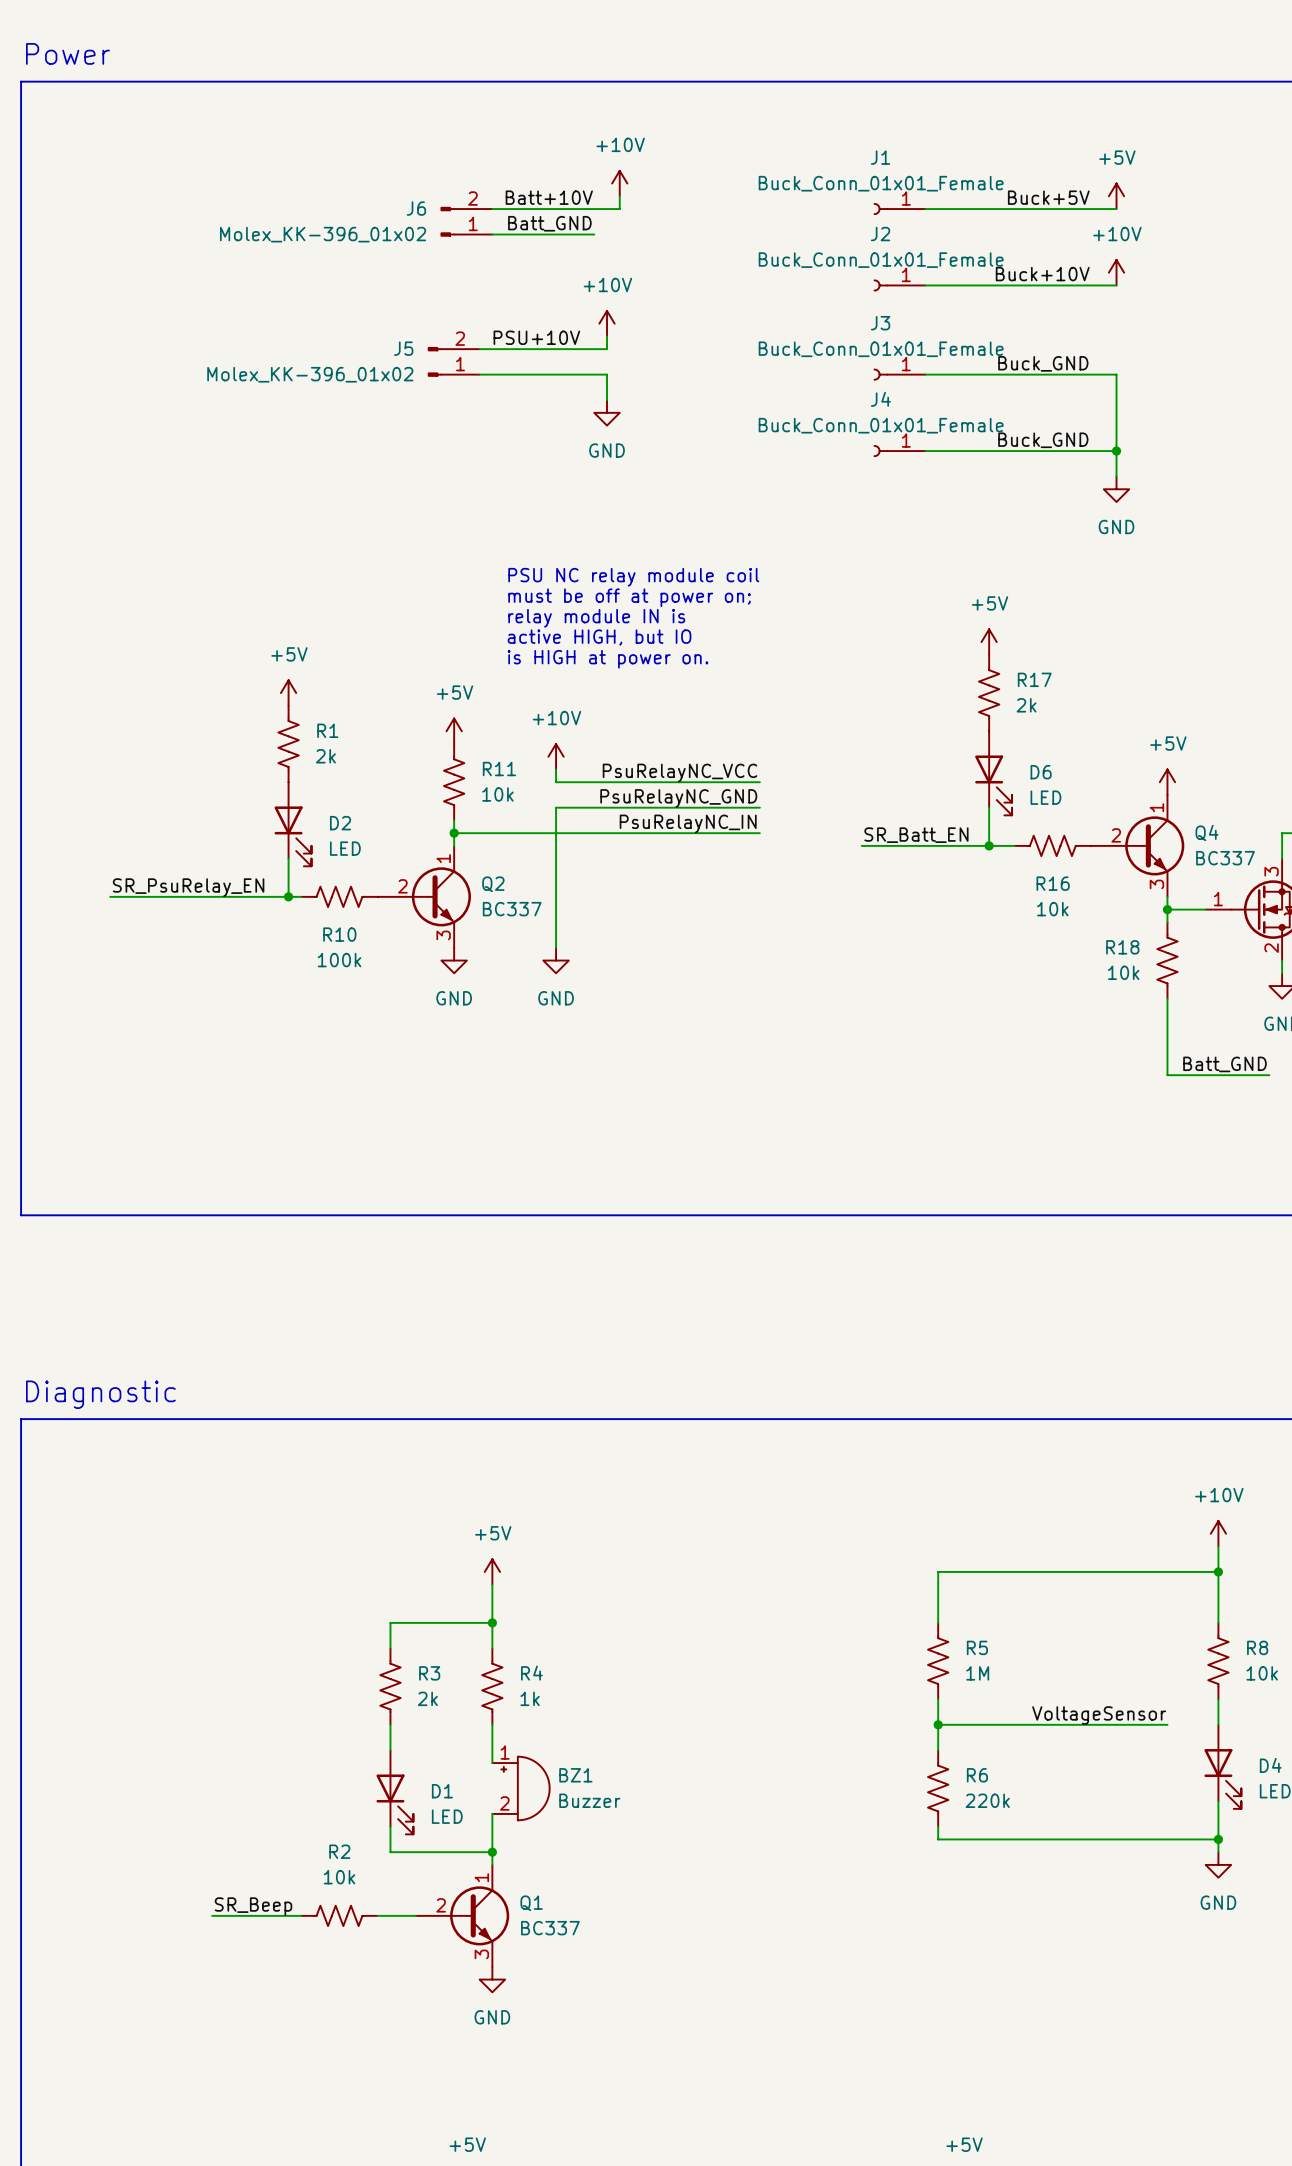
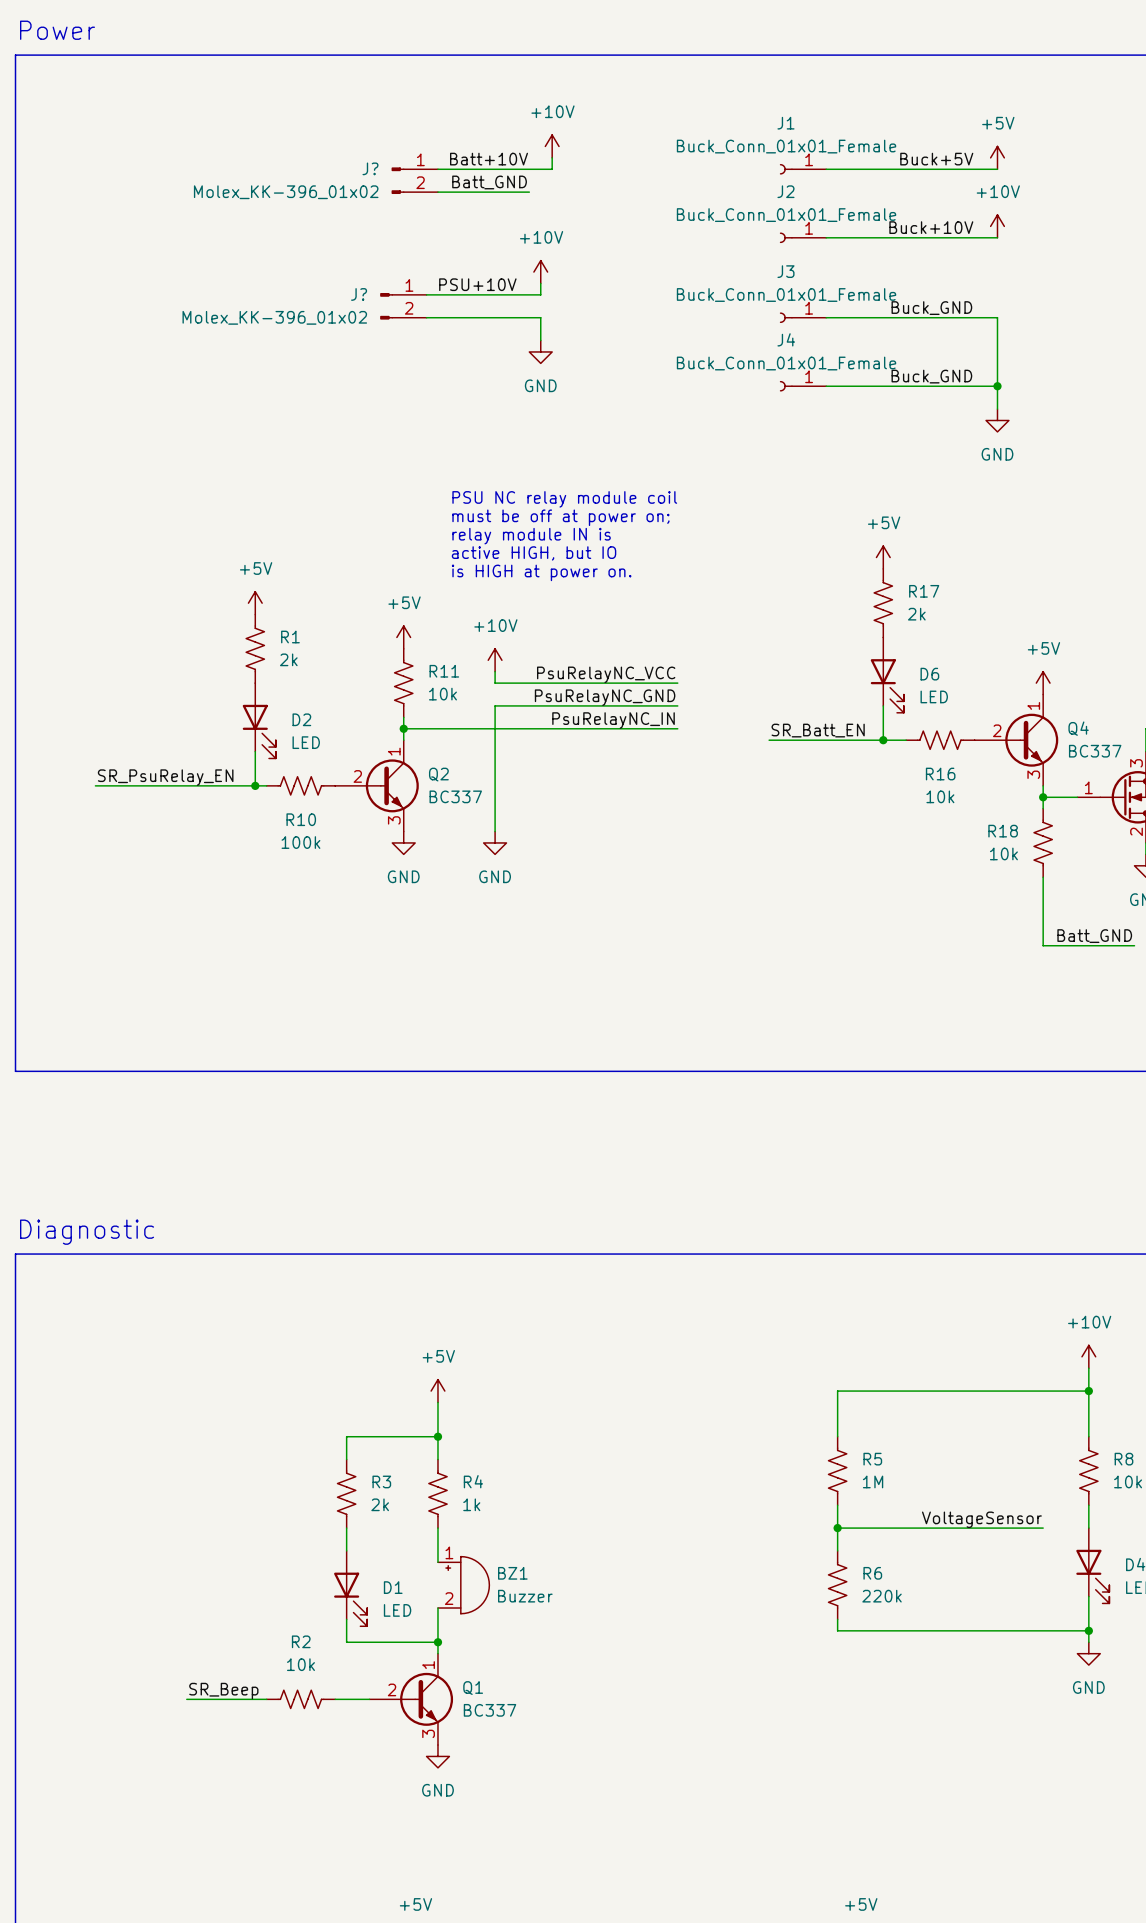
J6 name: J6 (416, 208) -> J? (370, 168)
J6 flip: as is (447, 221) -> up-down (398, 180)
J5 name: J5 (403, 348) -> J? (359, 294)
J5 flip: as is (435, 361) -> up-down (386, 306)

